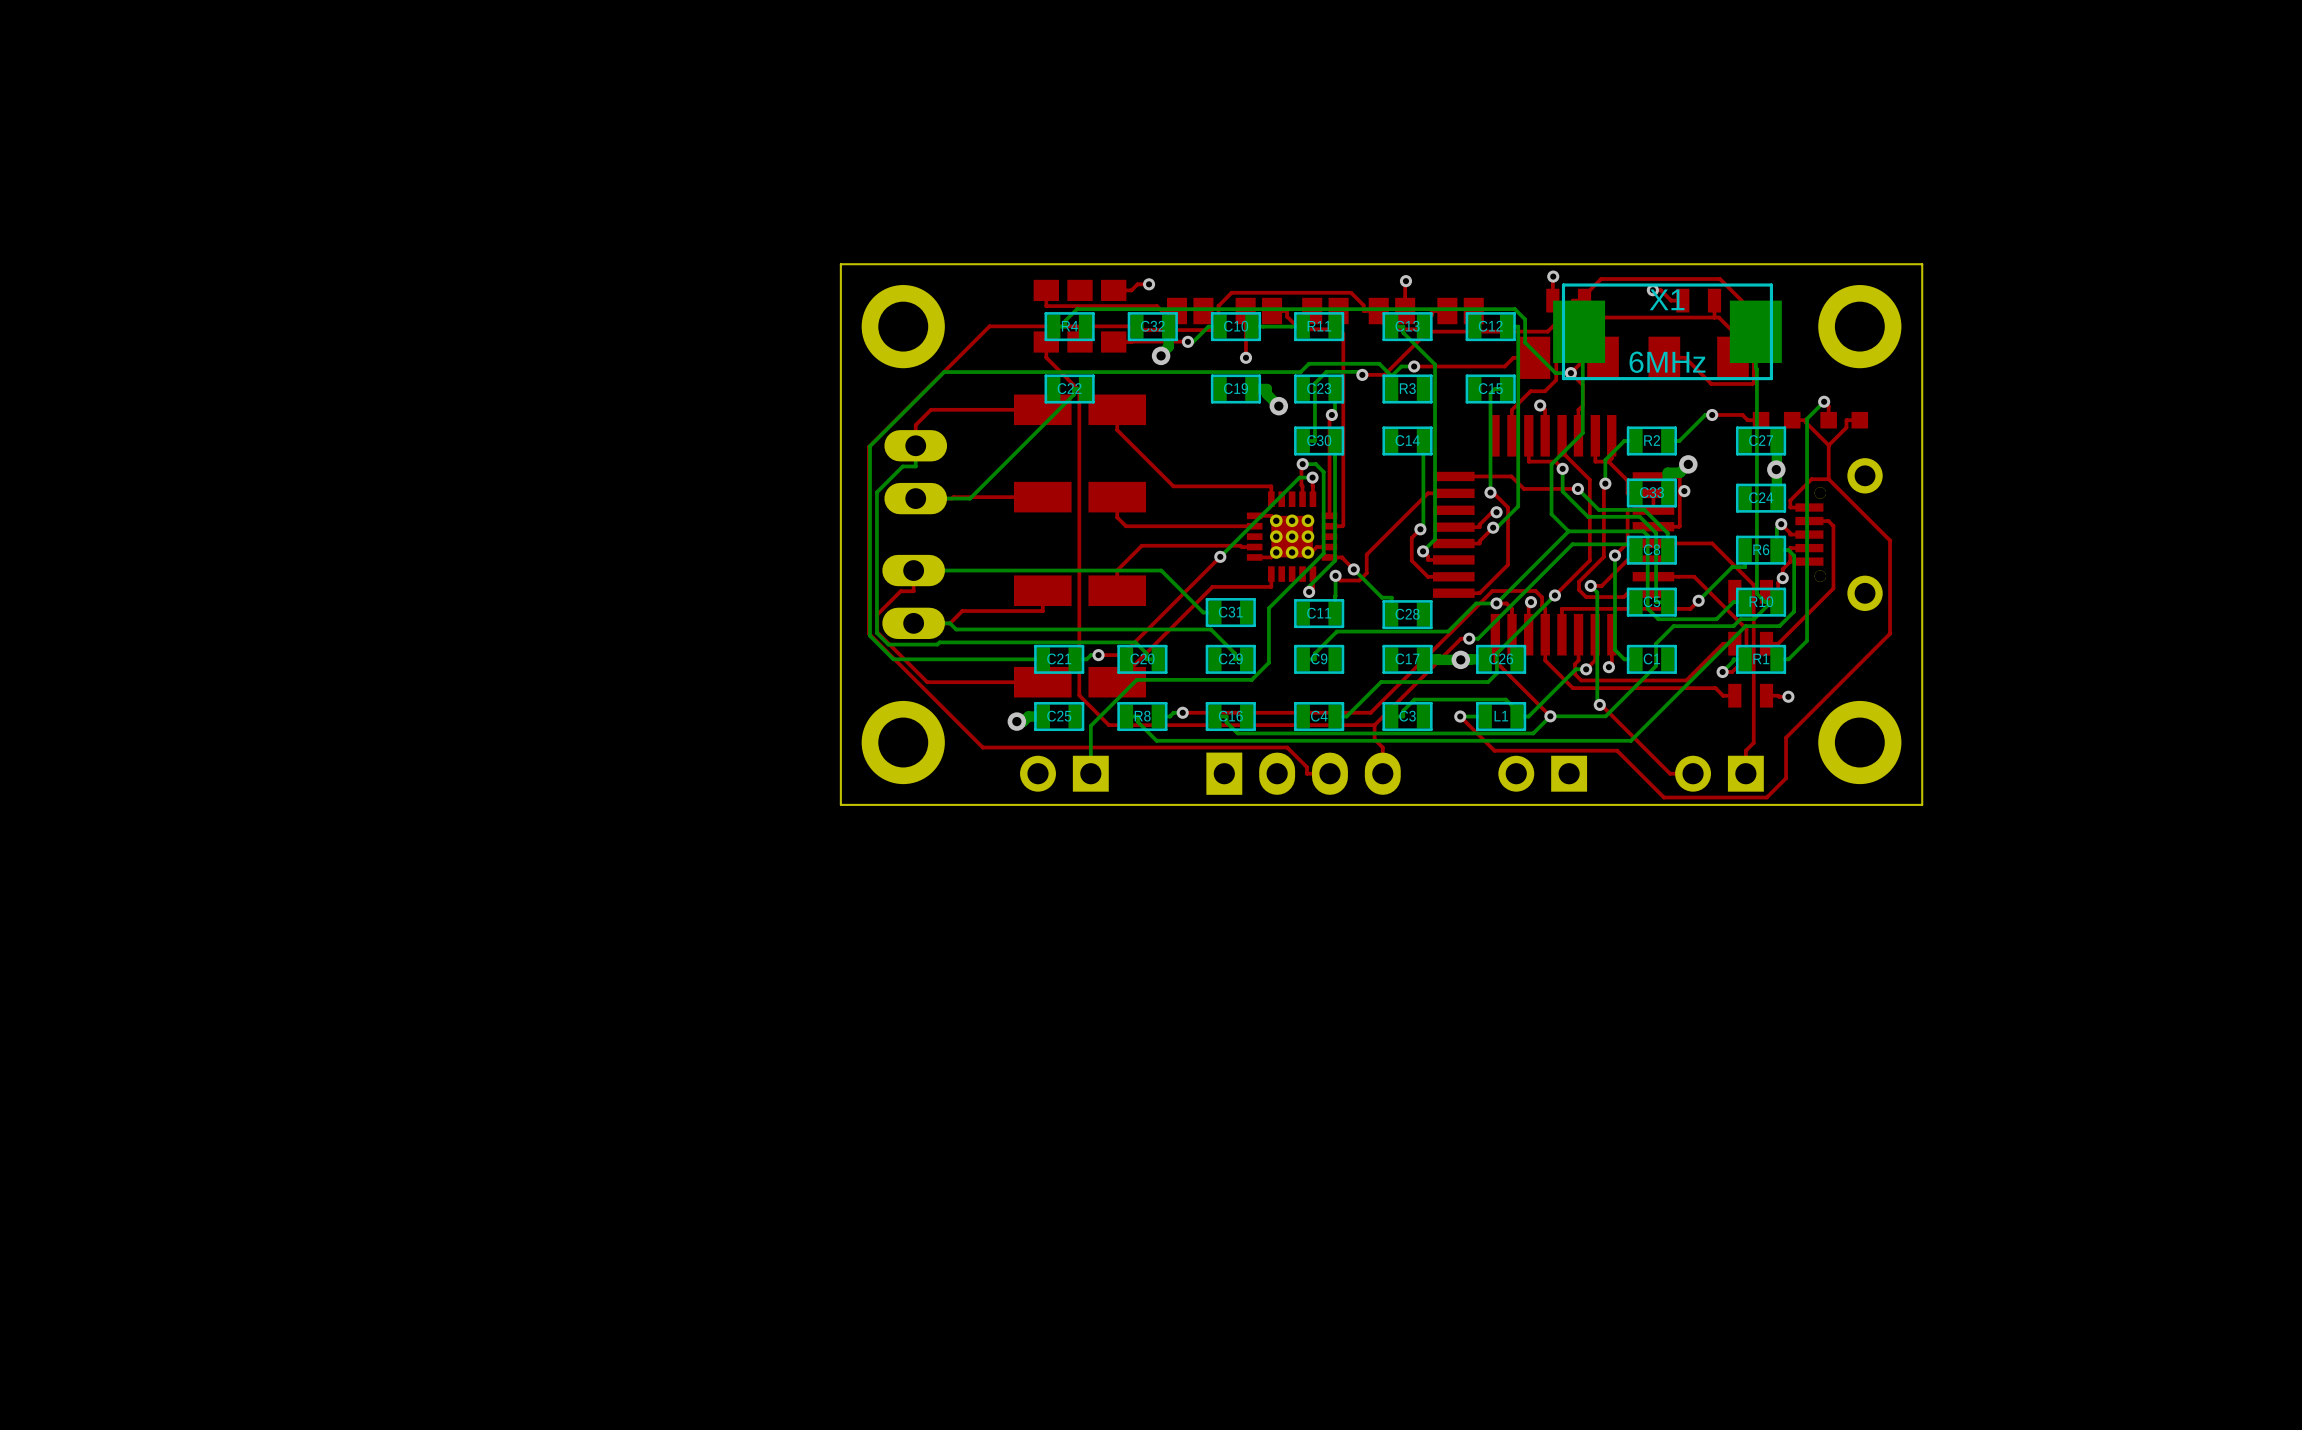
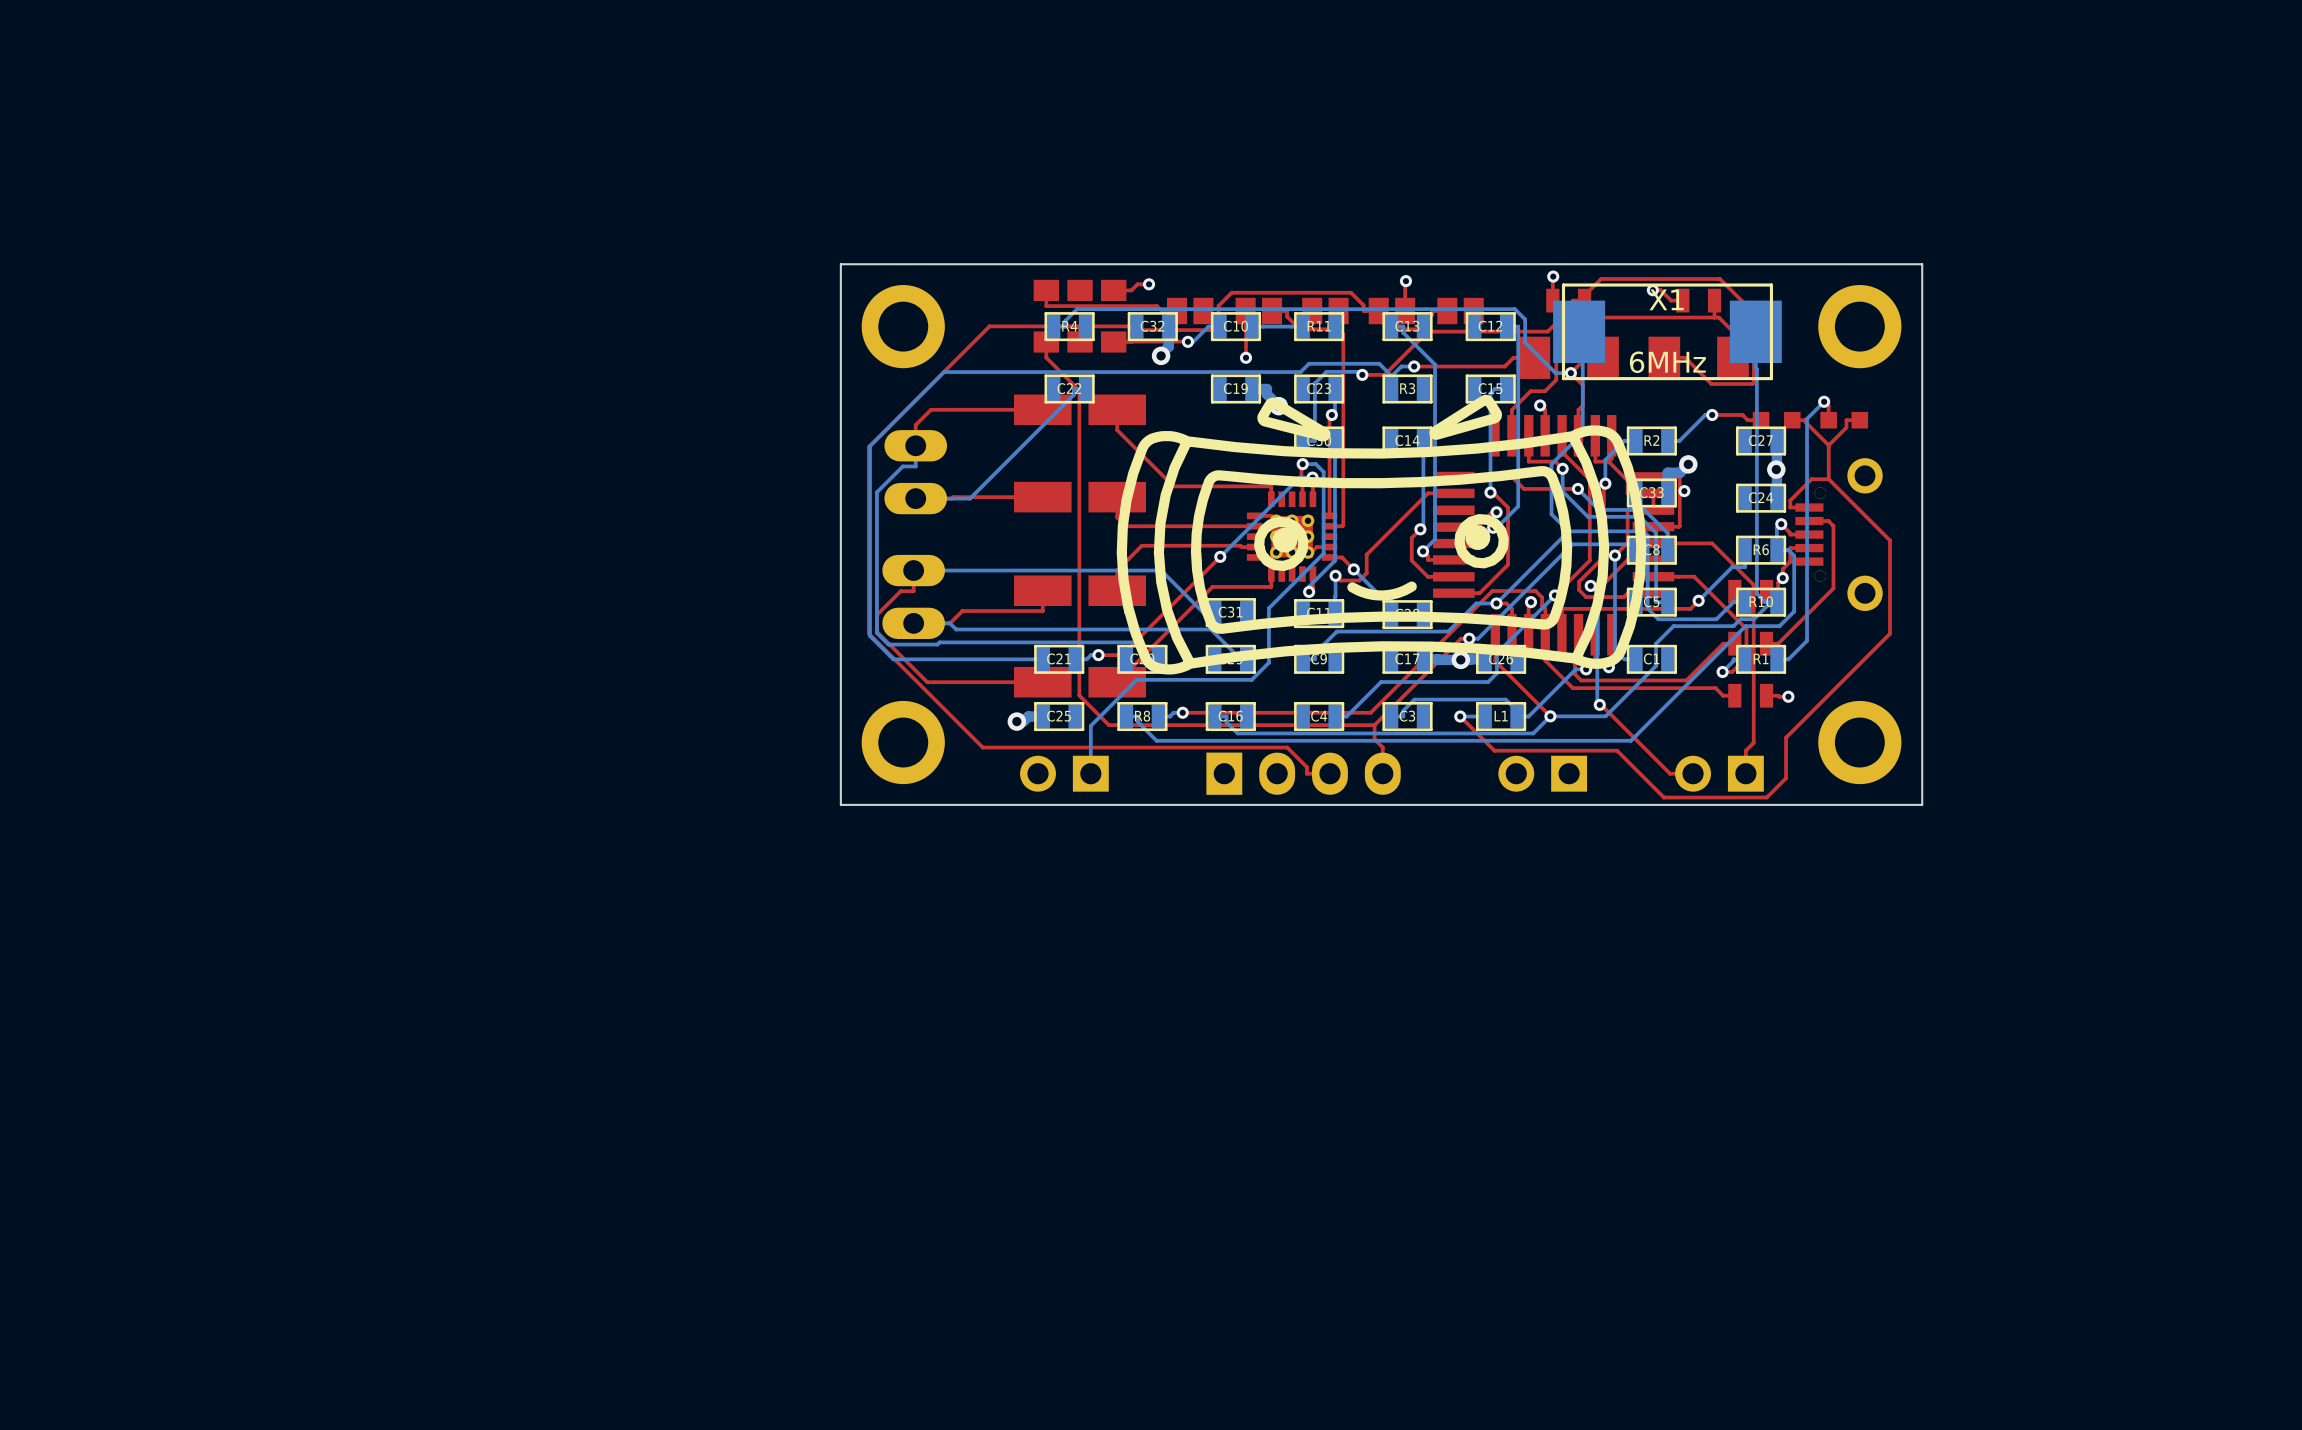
drawing: none -> [1116, 394, 1647, 675]

